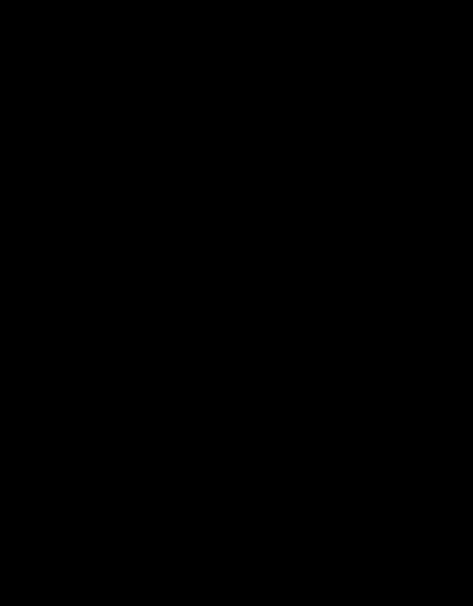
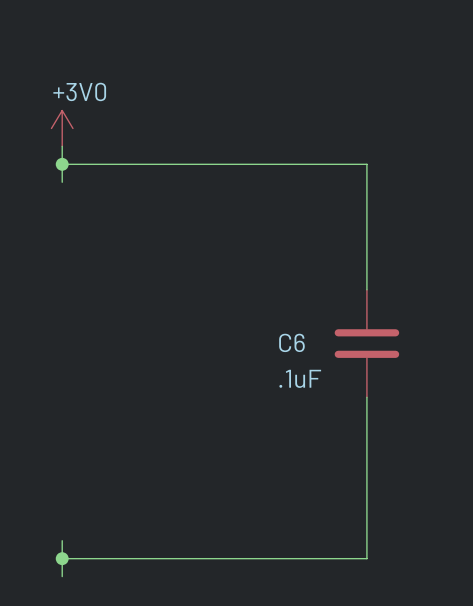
power symbol: none -> +3V0 (62, 128)
wire: none -> (62, 146) (62, 182)
wire: none -> (62, 164) (366, 164) (366, 289)
junction: none -> (62, 164)
C6: none -> .1uF (366, 343)
wire: none -> (366, 397) (366, 558) (62, 558)
wire: none -> (62, 540) (62, 576)
junction: none -> (62, 558)

